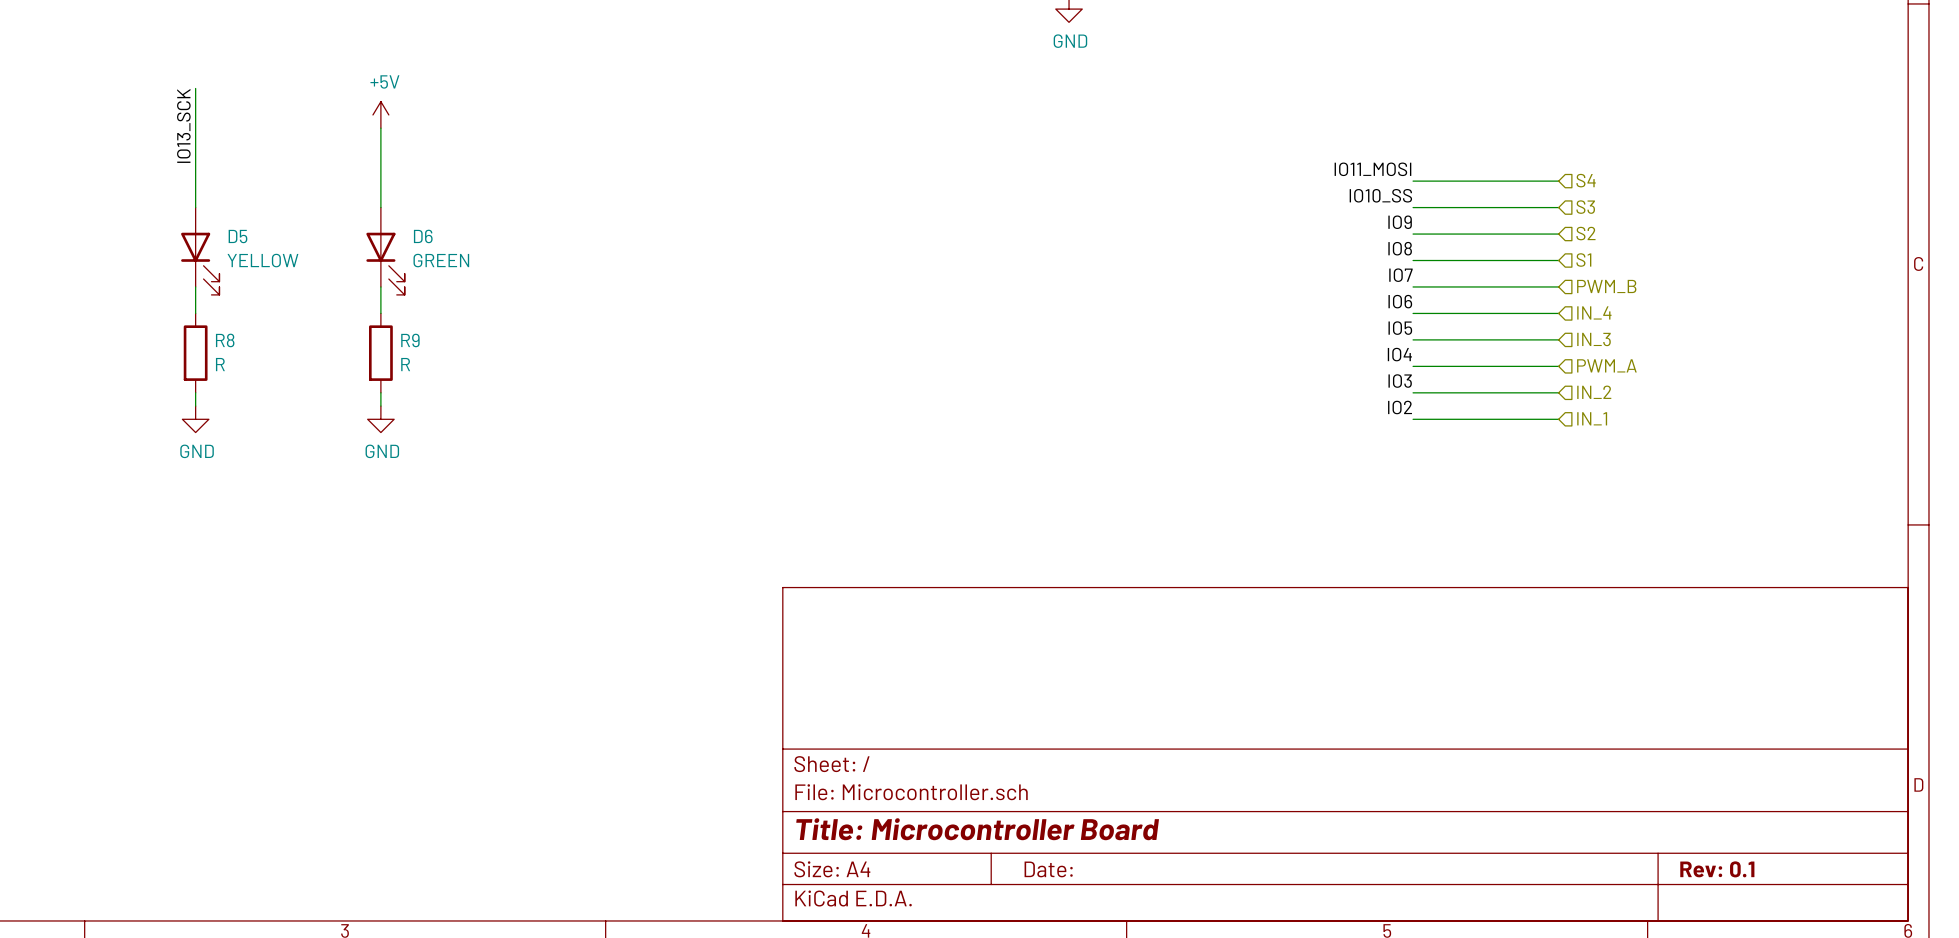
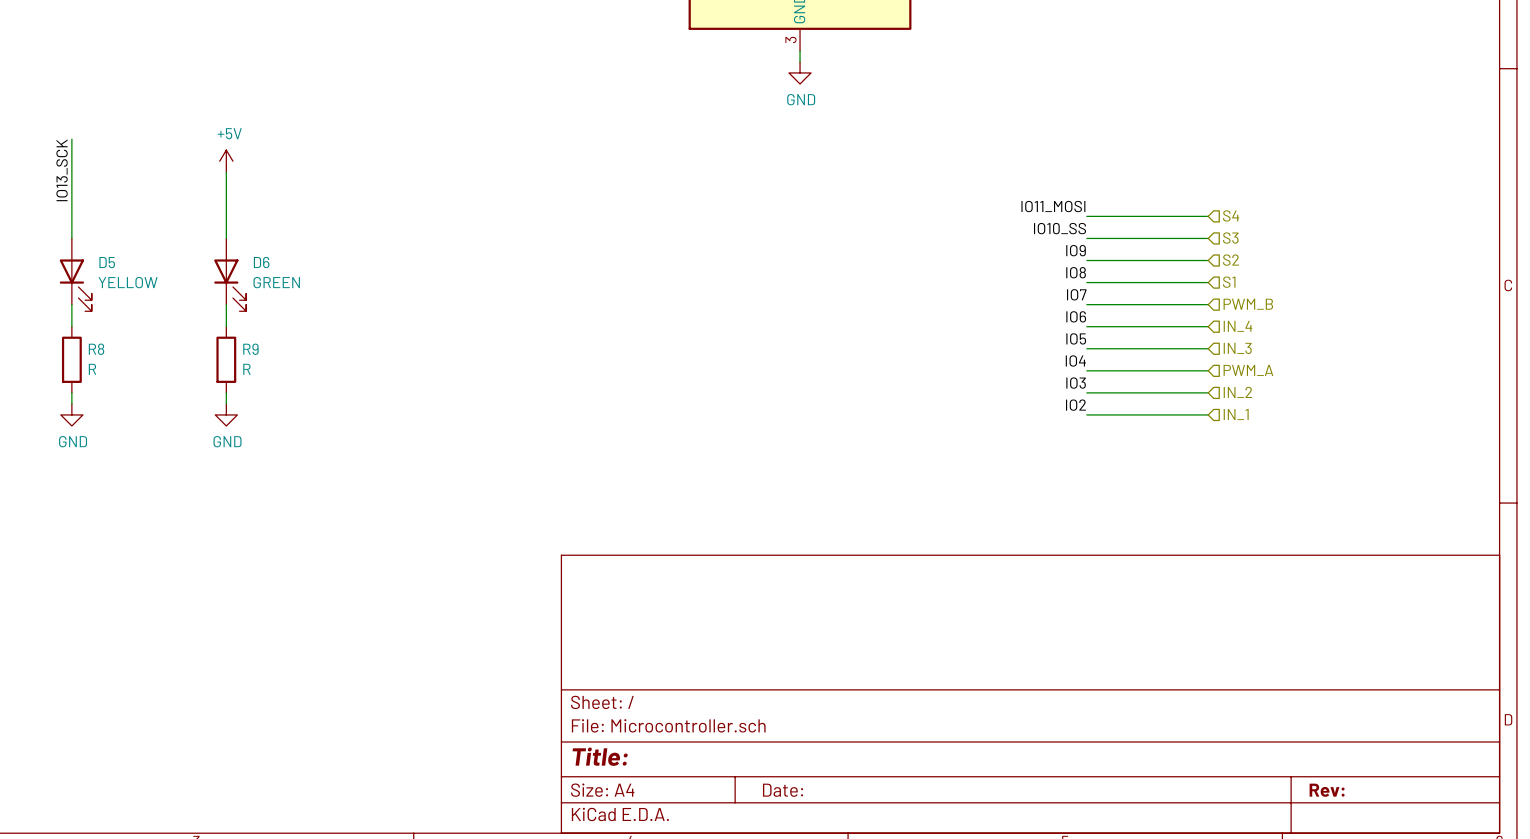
title block: Title: Microcontroller Board (977, 829) -> Title: (600, 756)
title block: Rev: 0.1 (1717, 869) -> Rev: (1327, 790)

